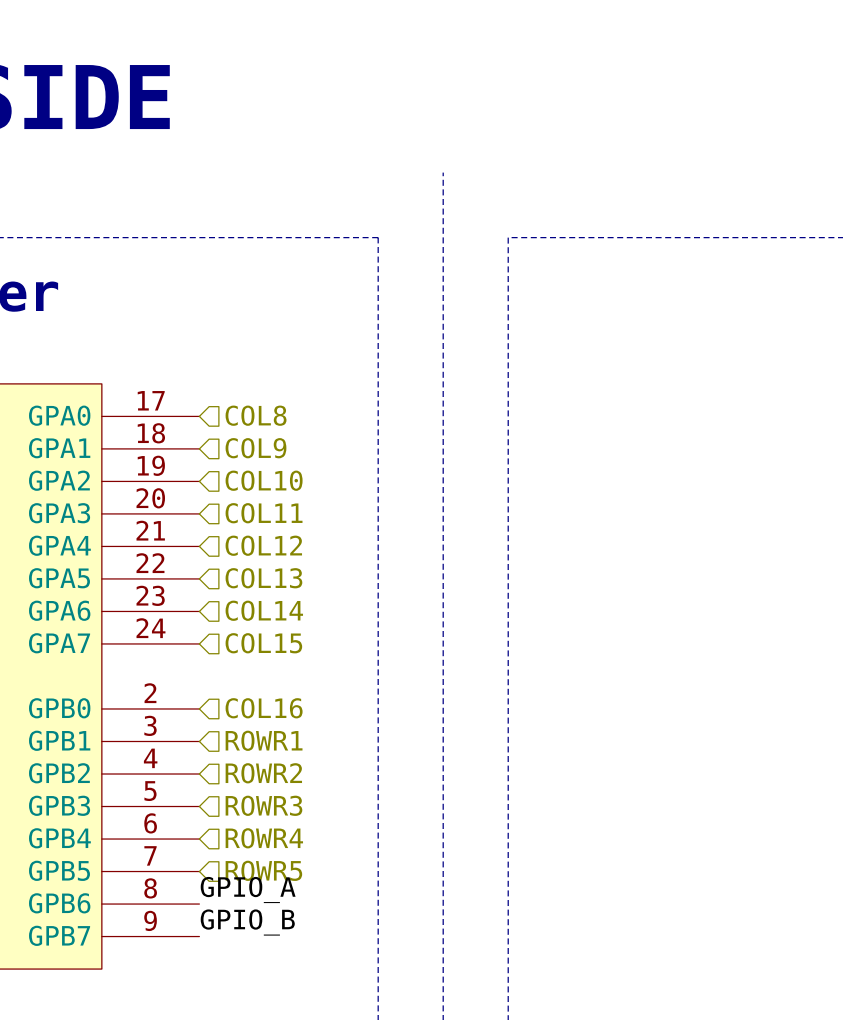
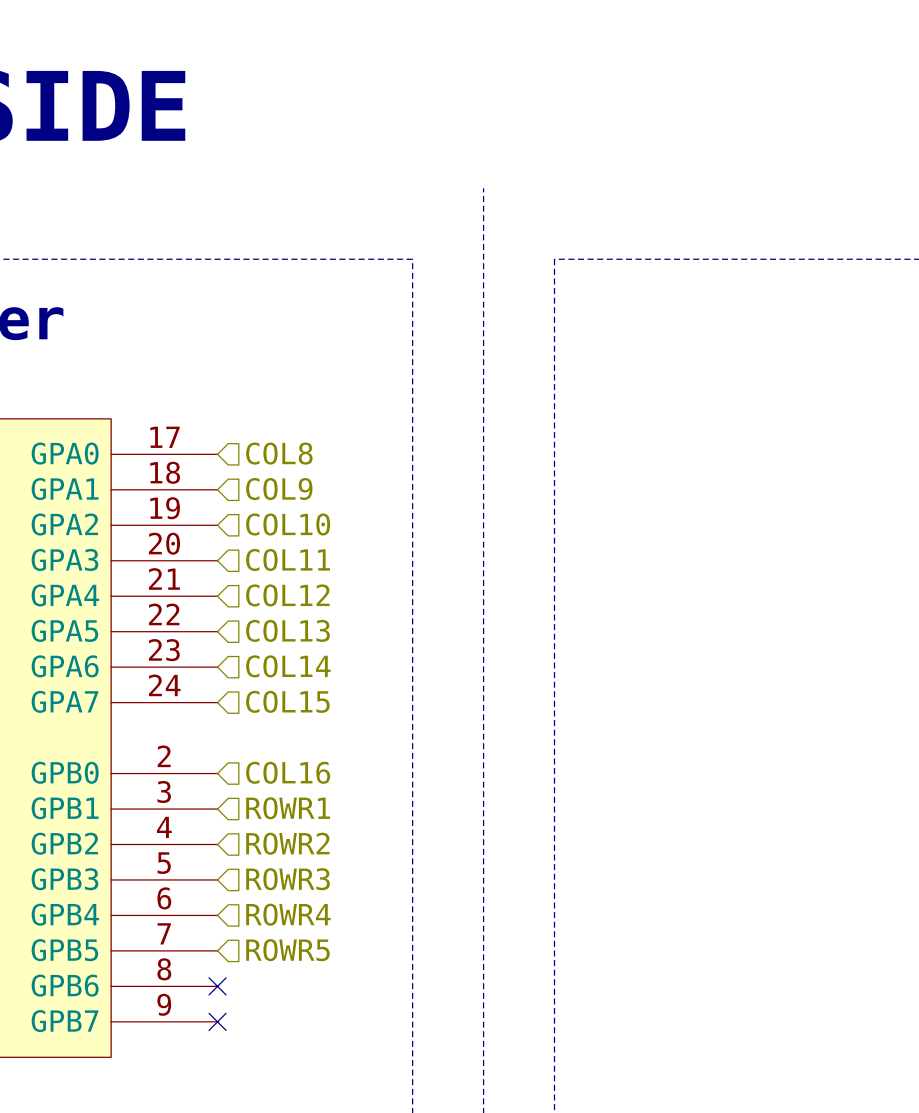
label: GPIO_A (248, 890) -> none
no-connect mark: none -> (217, 986)
label: GPIO_B (247, 922) -> none
no-connect mark: none -> (217, 1021)

